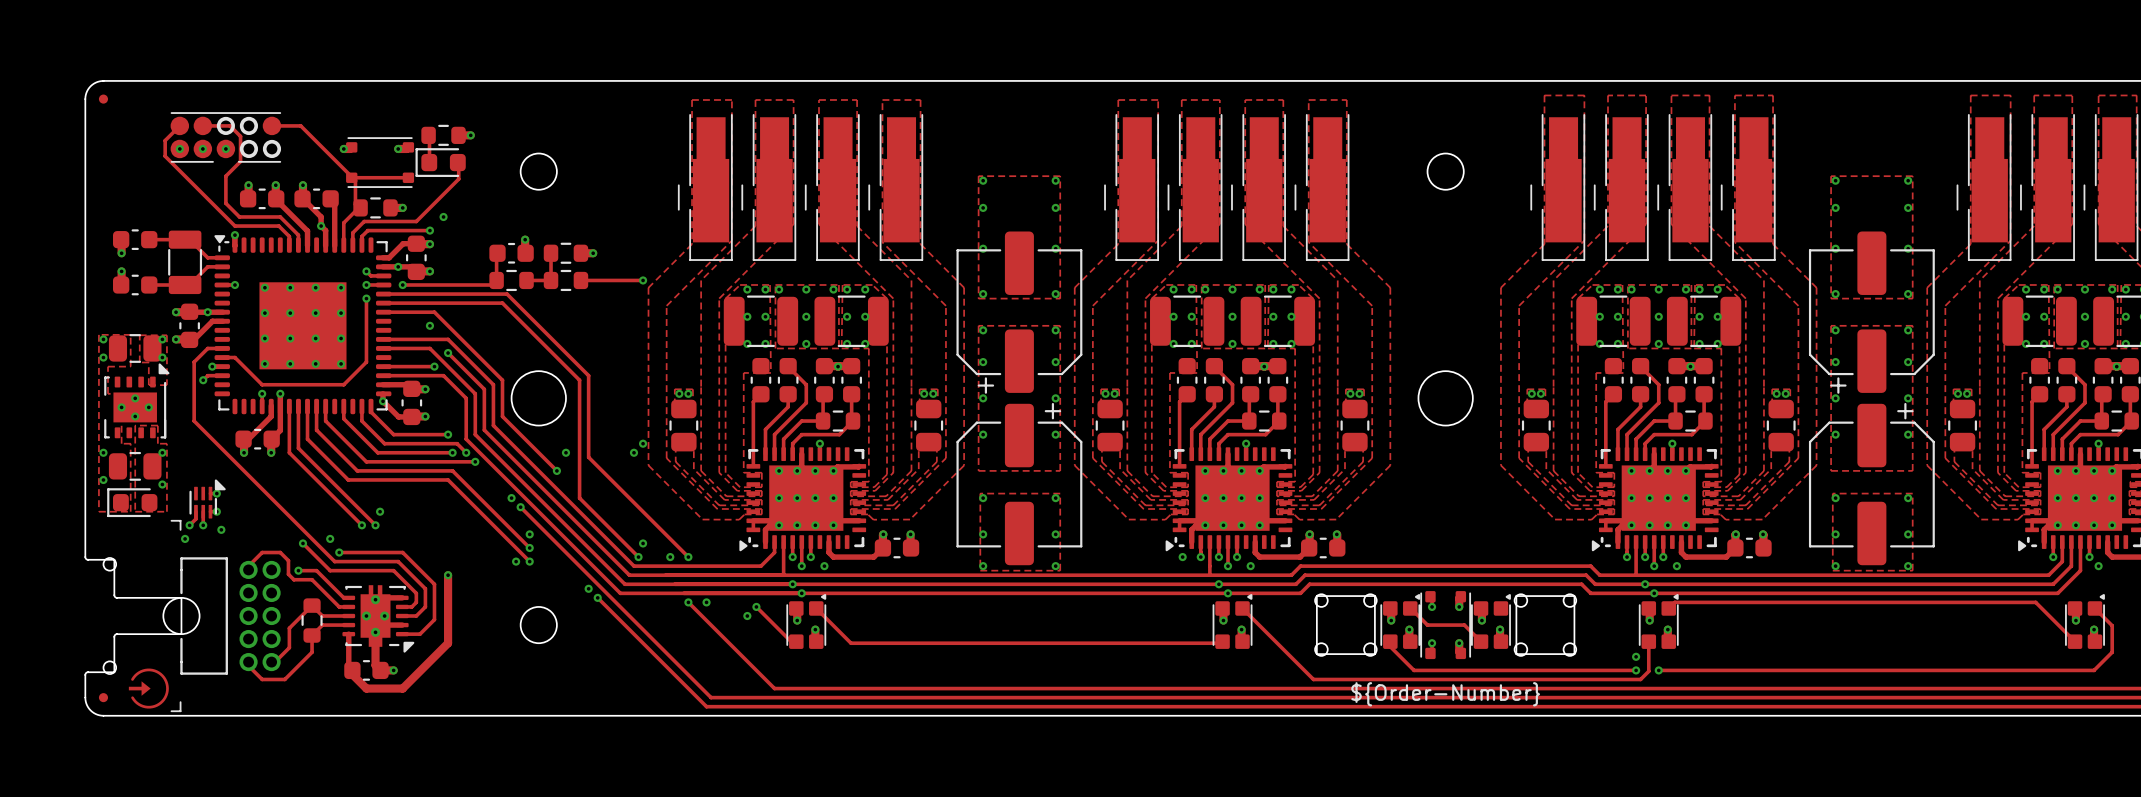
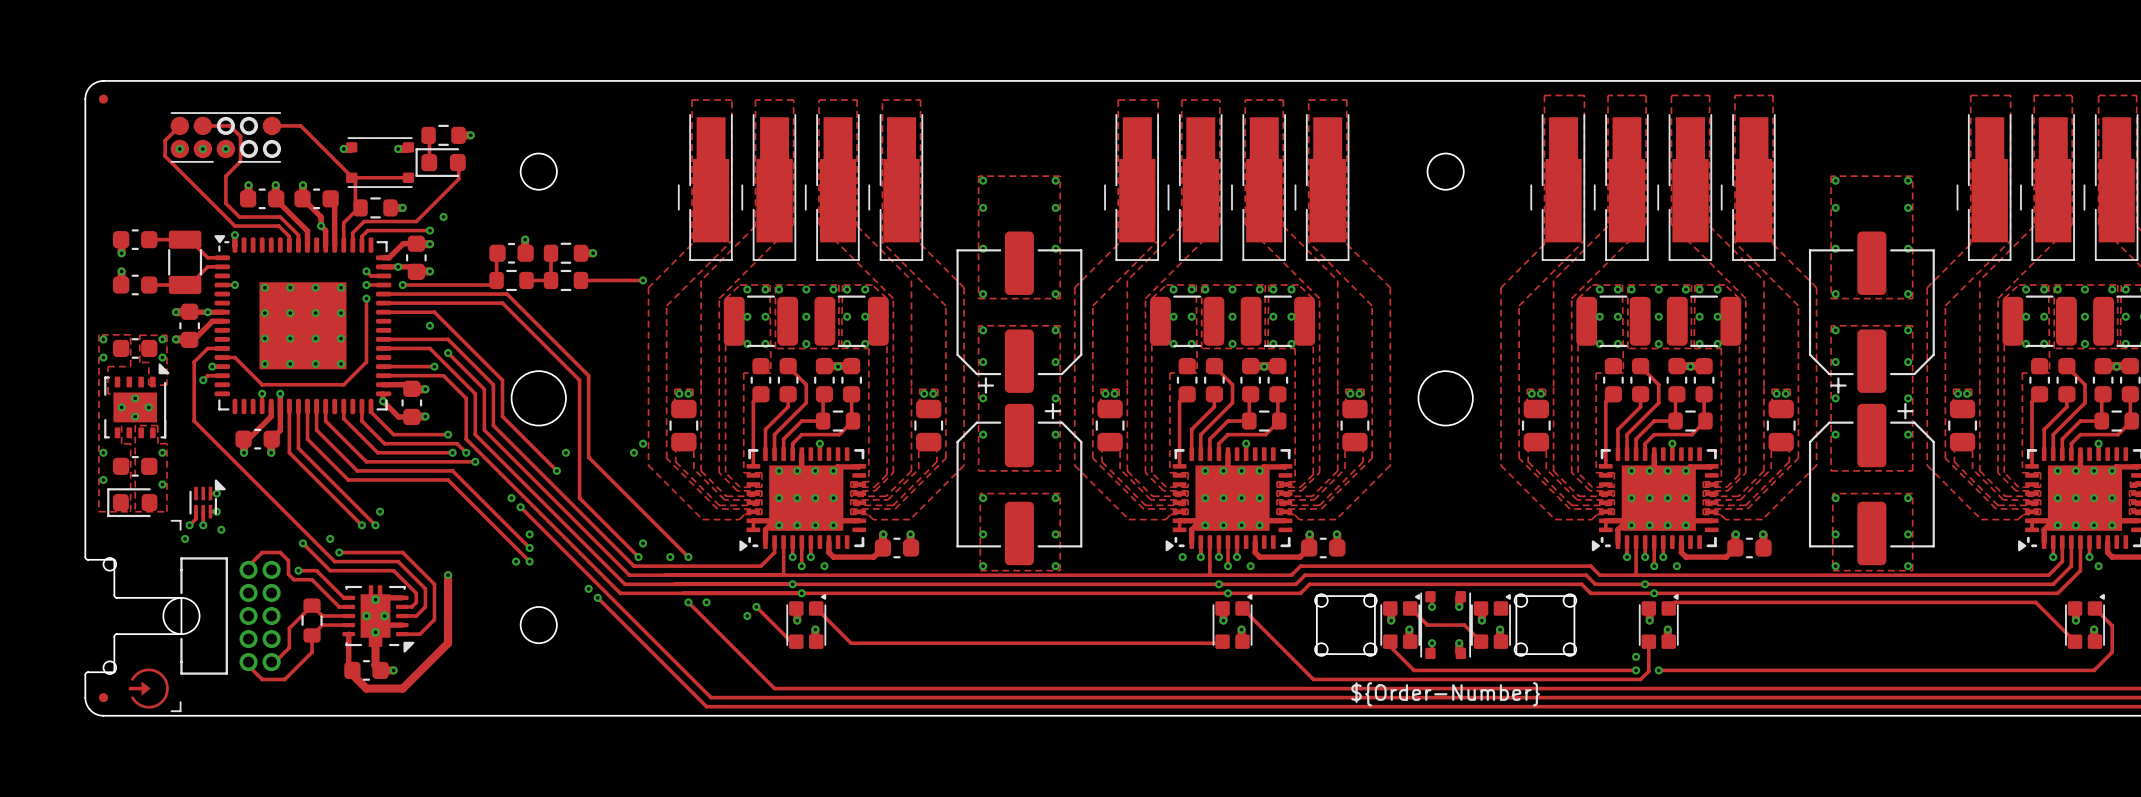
part footprint: [108, 334, 162, 363] -> [112, 338, 158, 359]
part footprint: [108, 451, 162, 481] -> [112, 456, 158, 477]

